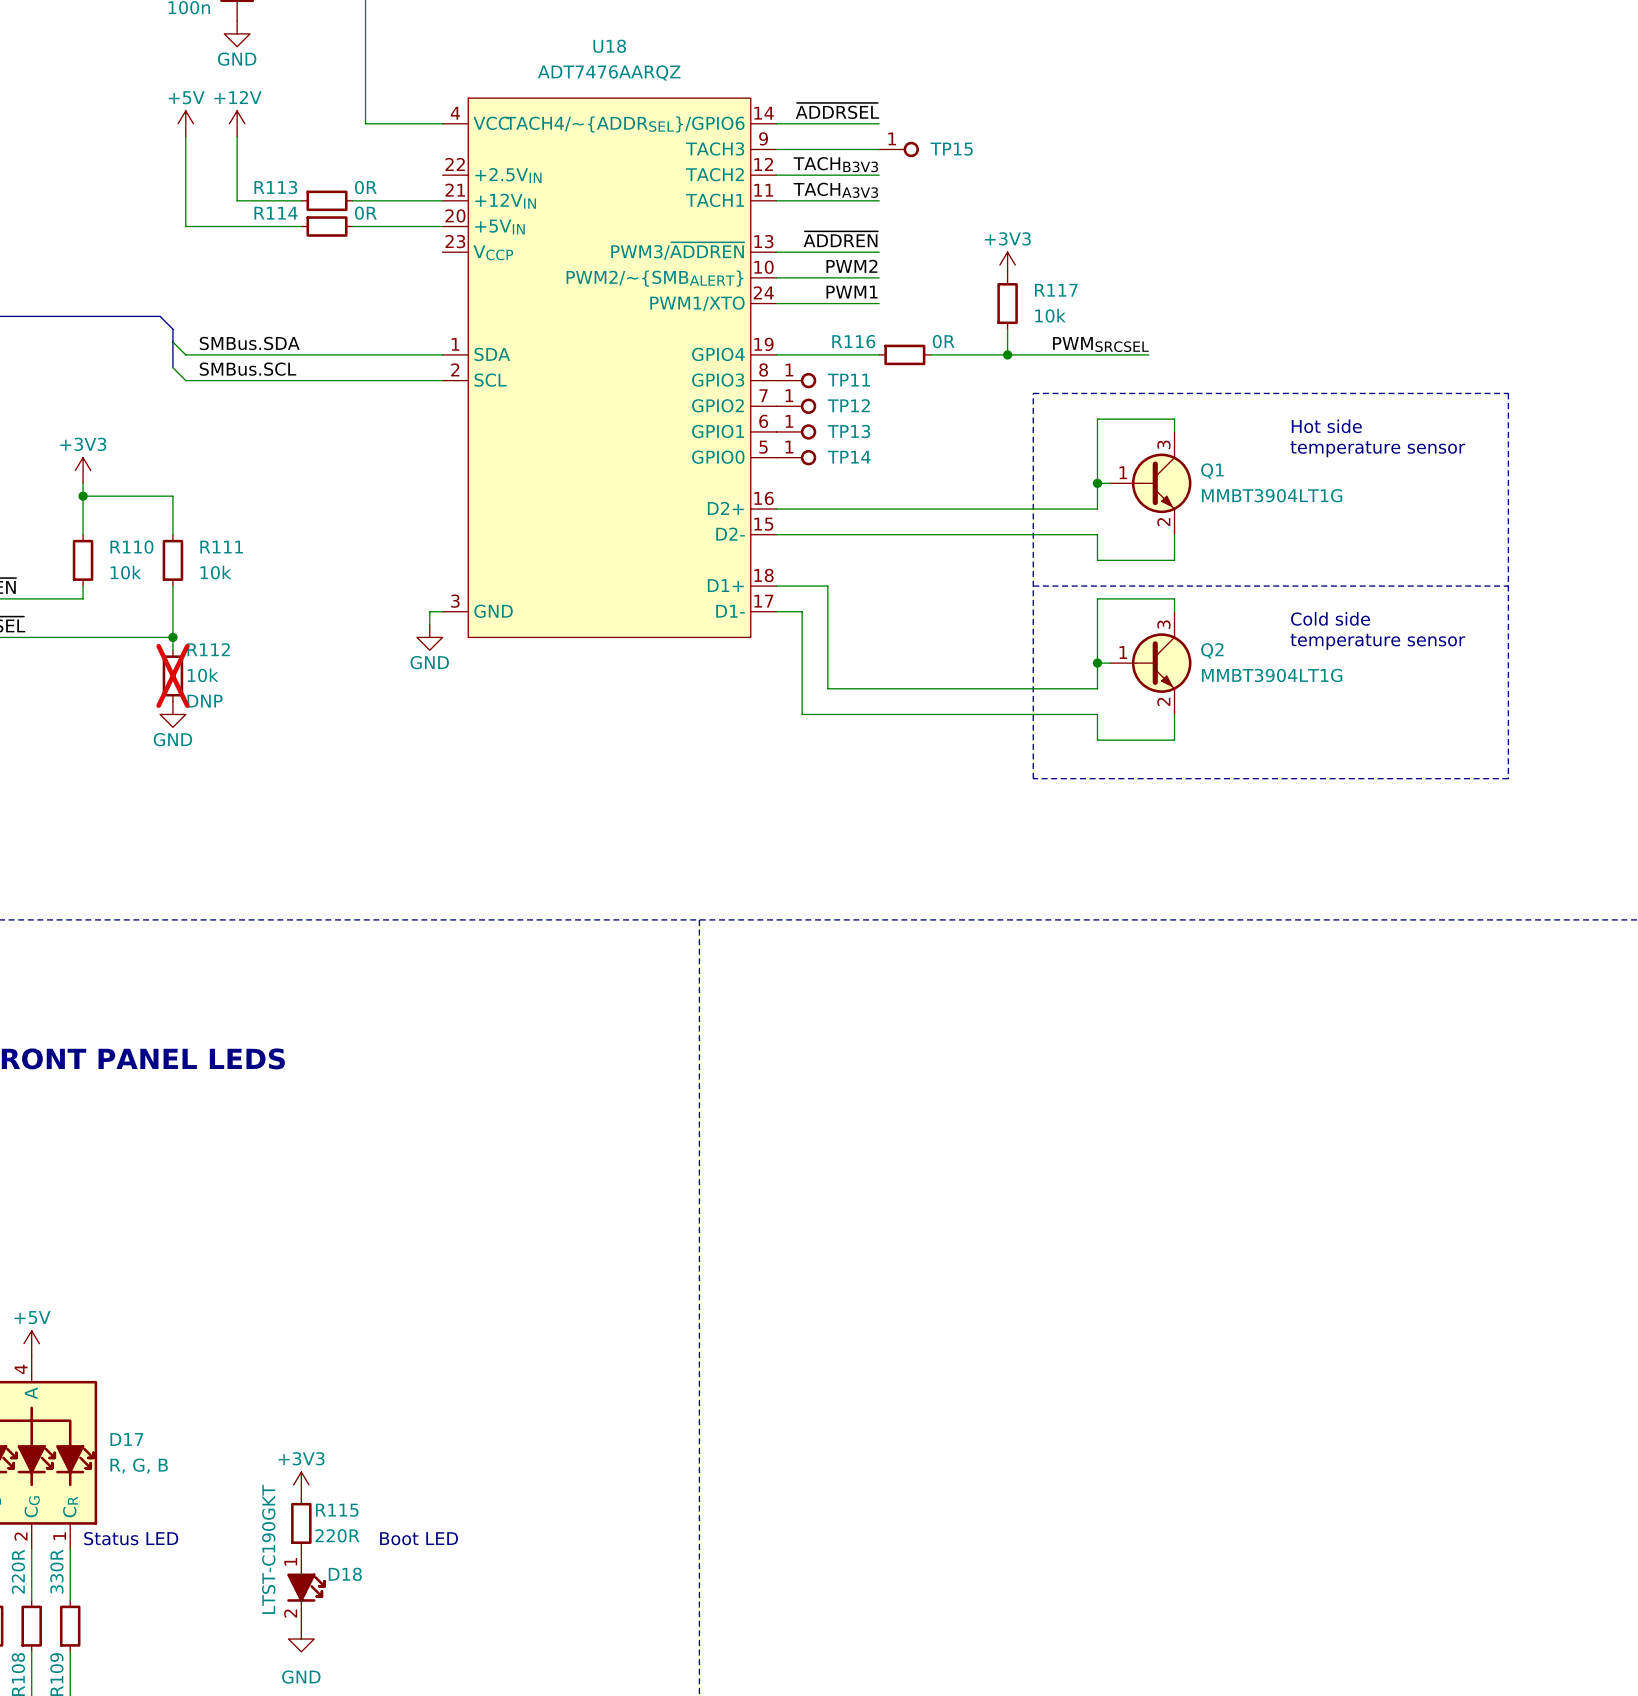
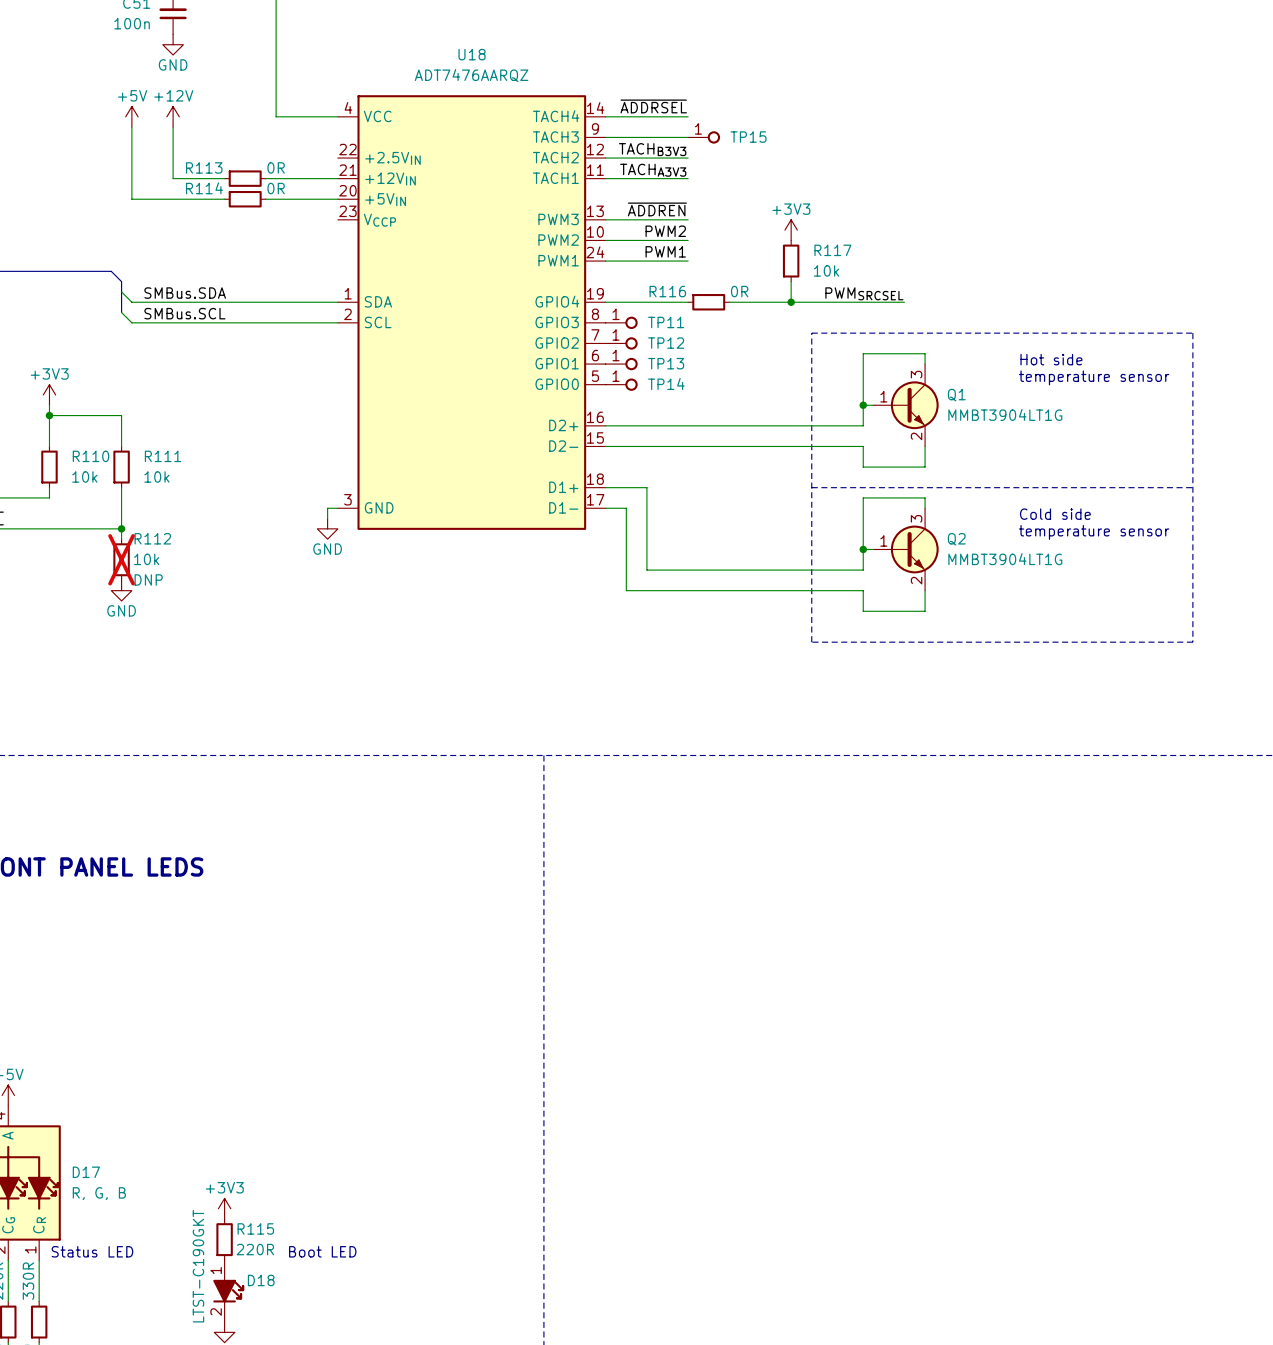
U18 symbol: [442, 98, 777, 638] -> [337, 95, 606, 530]

